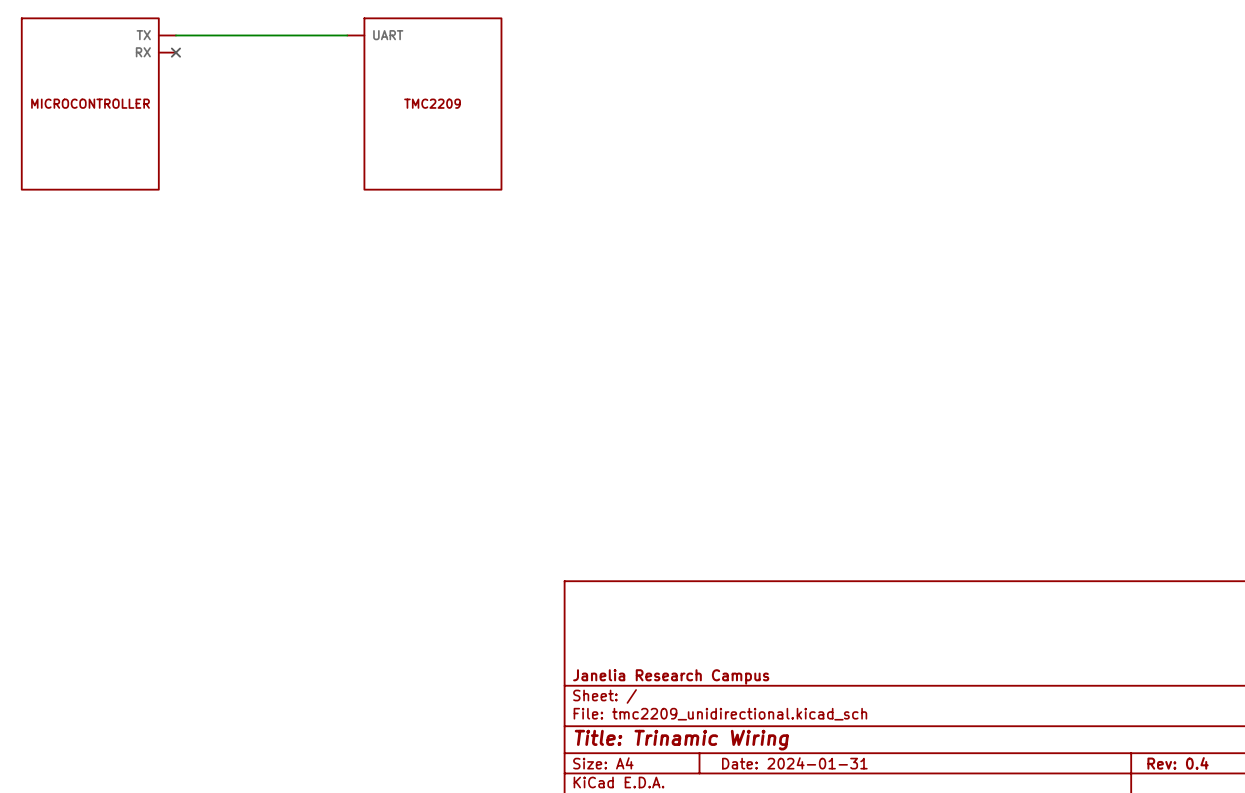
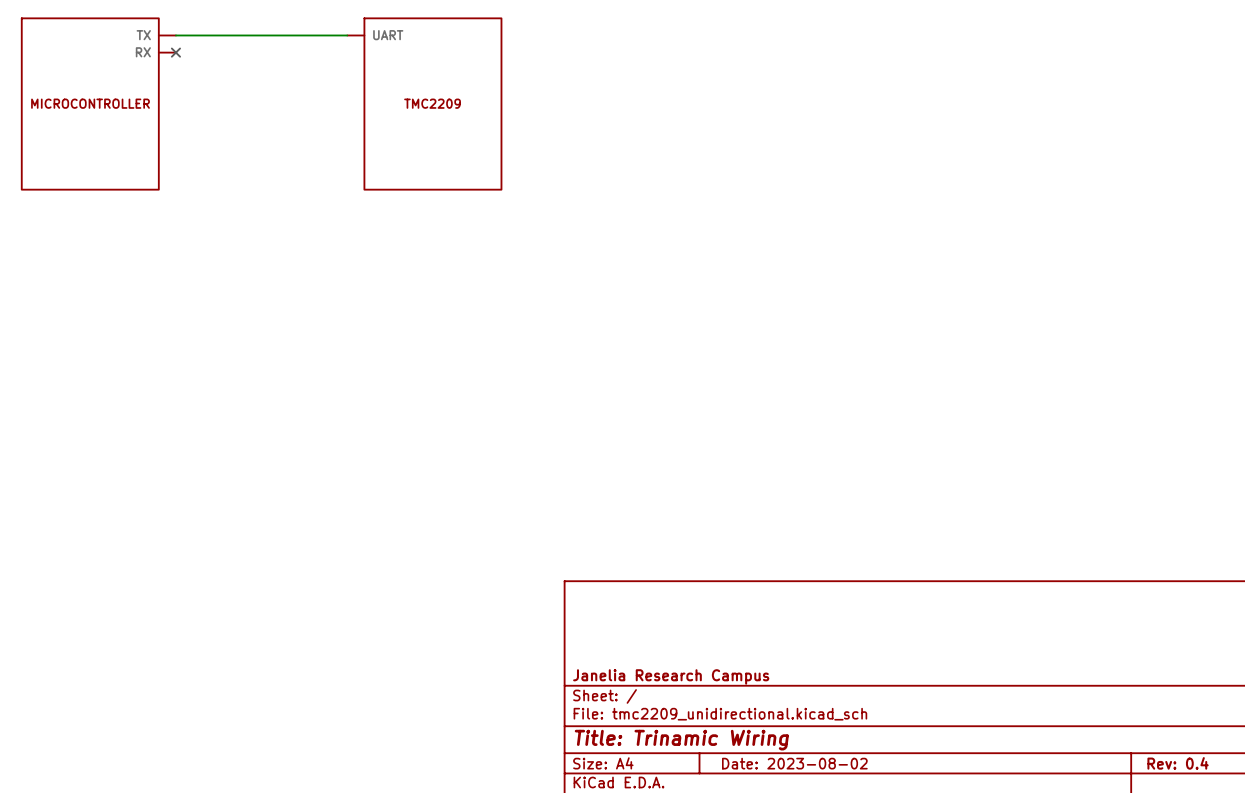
title block: Date: 2024-01-31 (794, 763) -> Date: 2023-08-02 (794, 763)

